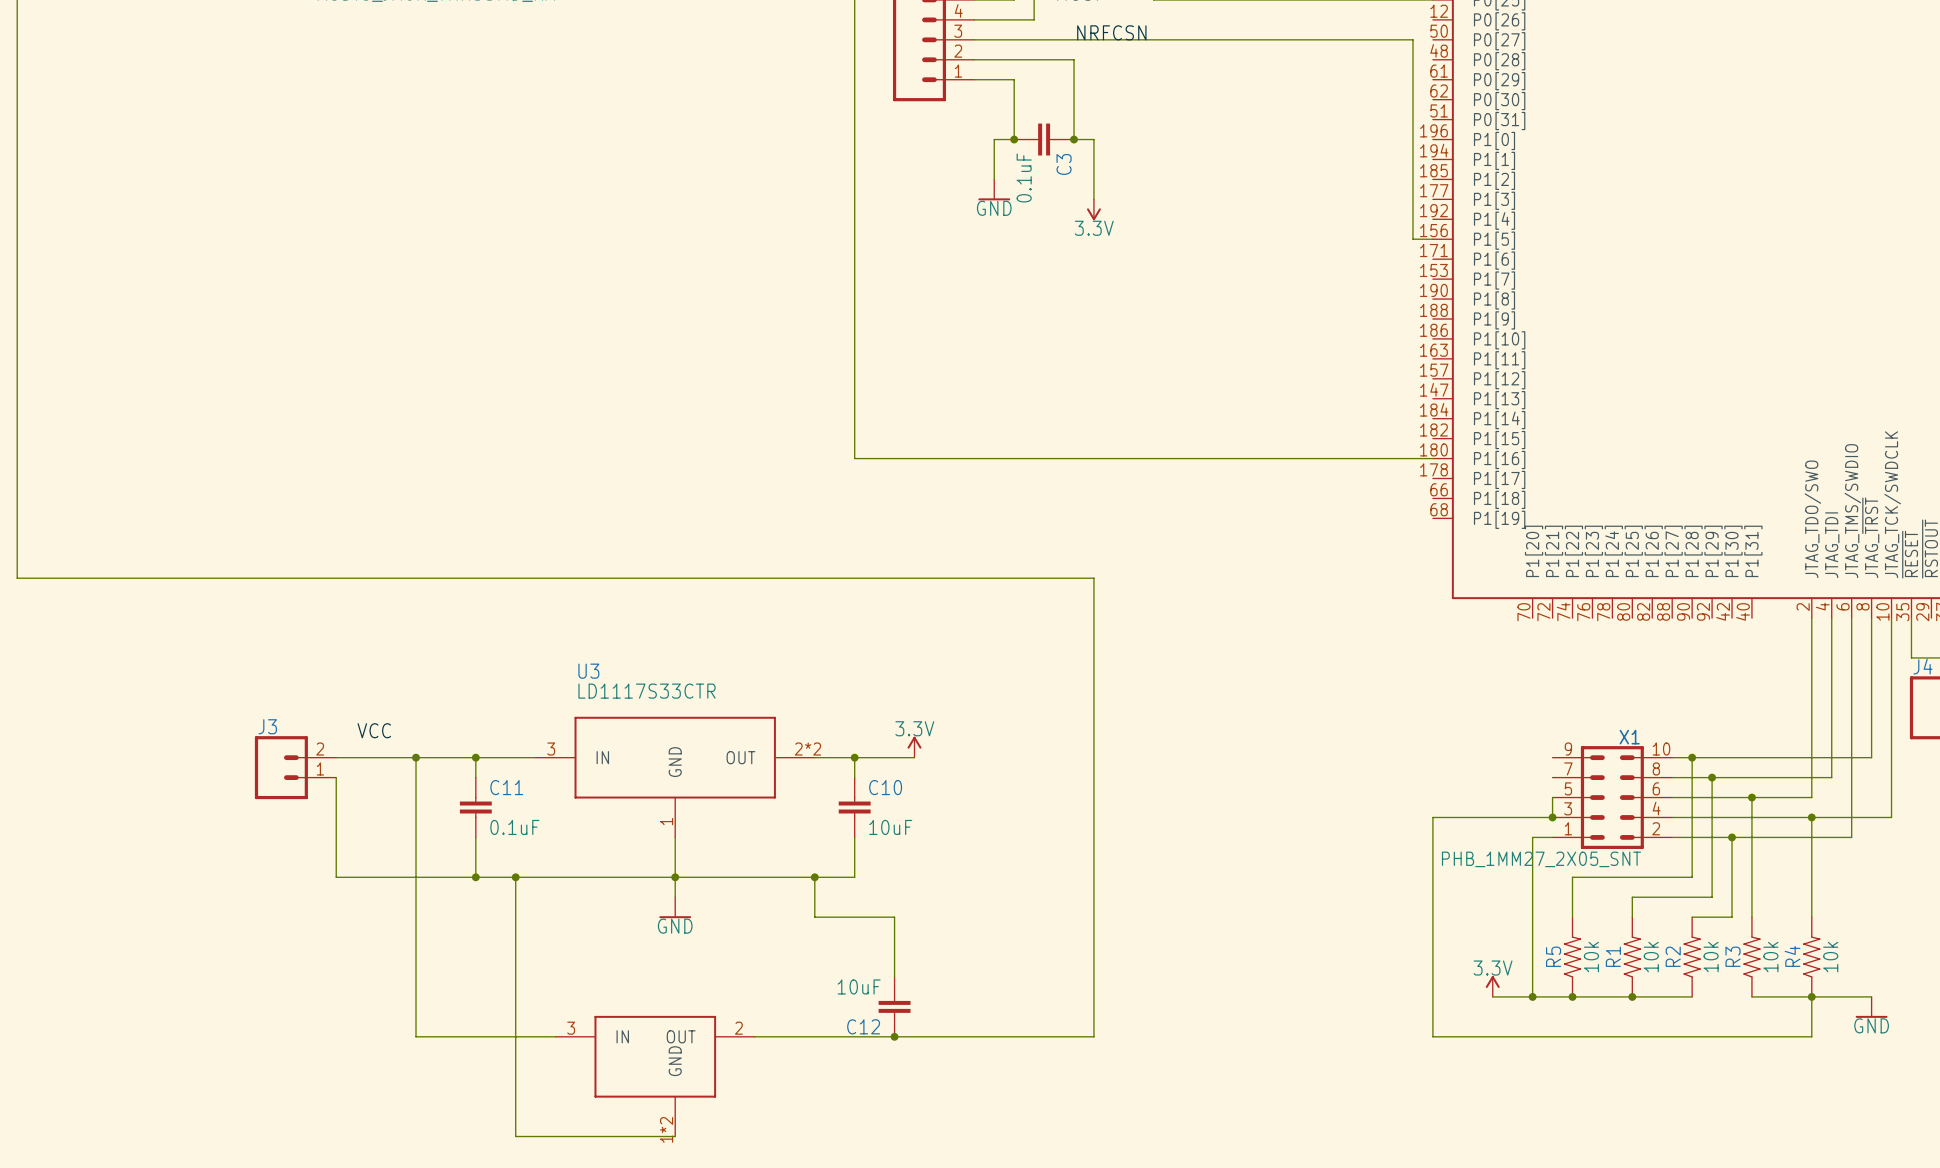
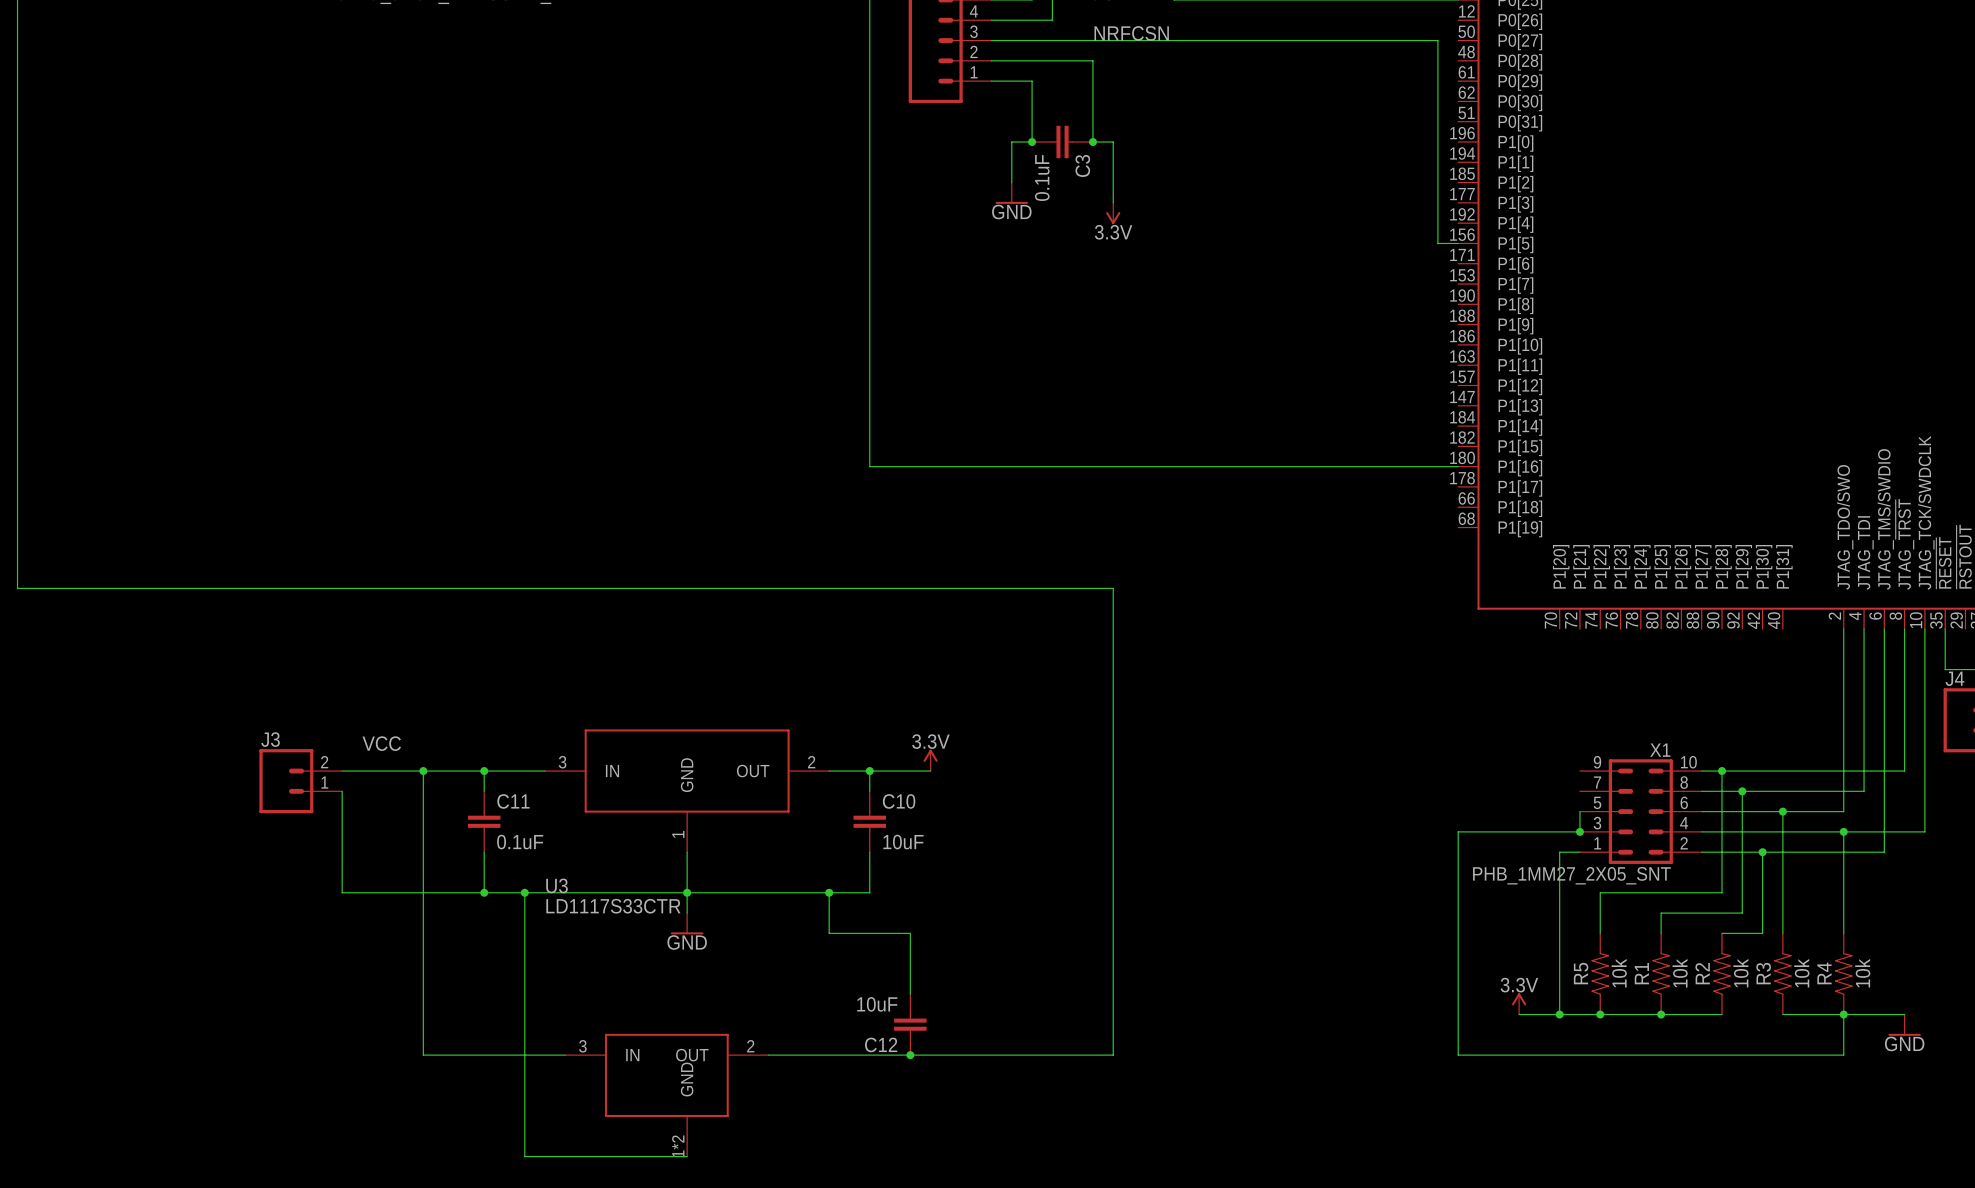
U3 name position: U3 (588, 671) -> U3 (557, 885)
U3 value position: LD1117S33CTR (647, 691) -> LD1117S33CTR (613, 906)
U3 pin number: 2*2 (807, 749) -> 2 (811, 762)

